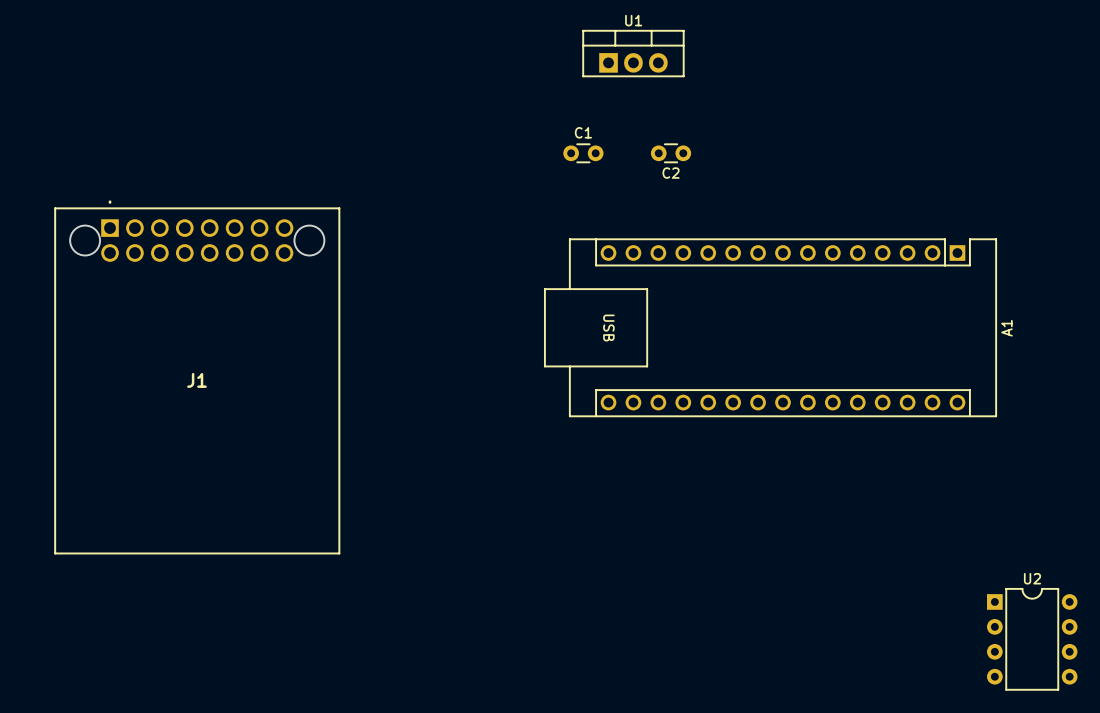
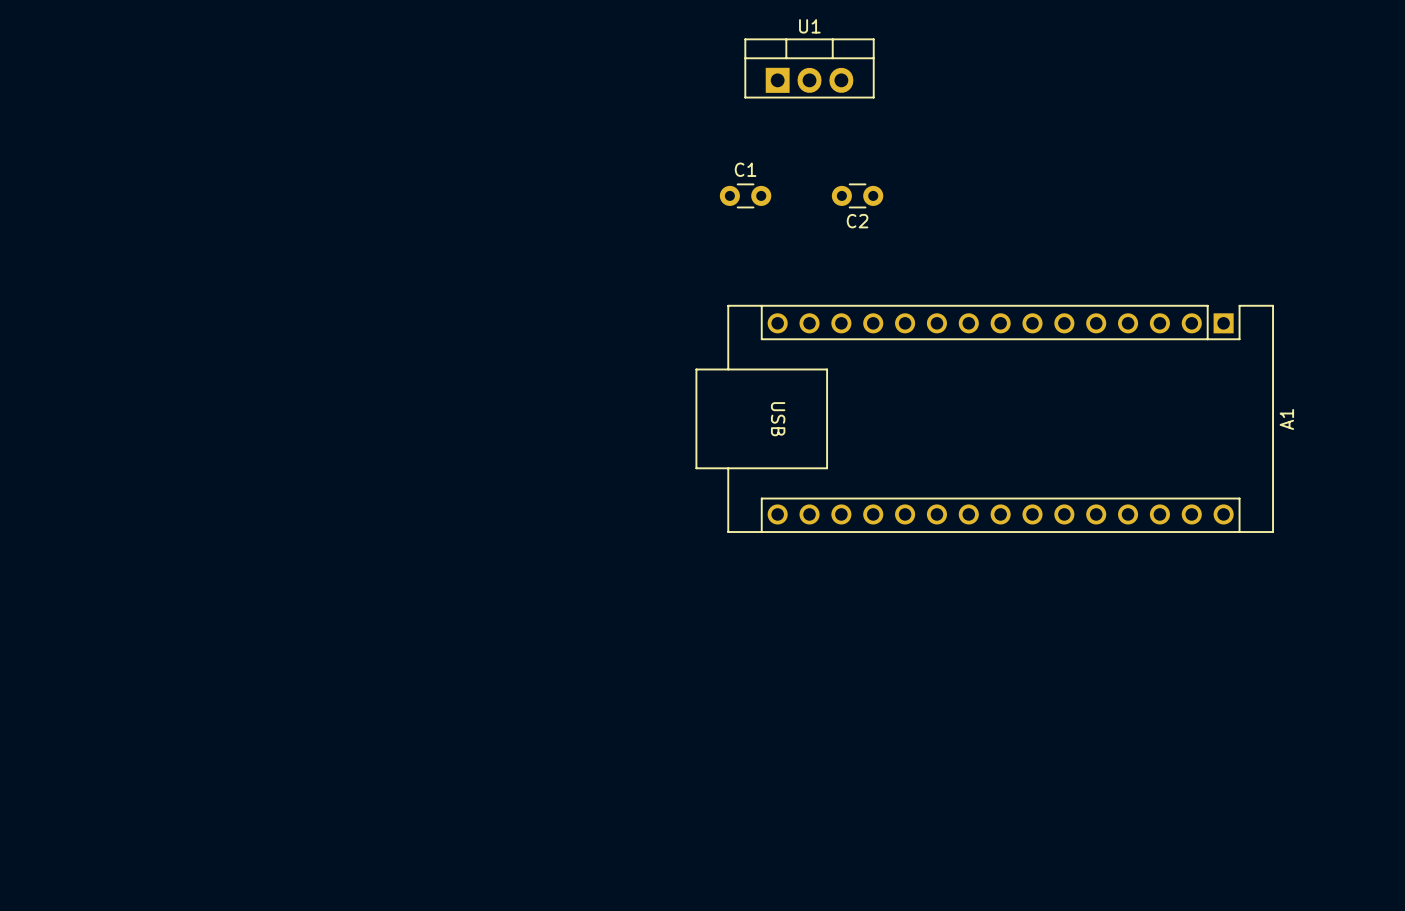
J1: (197, 377) -> none
U2: (1032, 639) -> none

